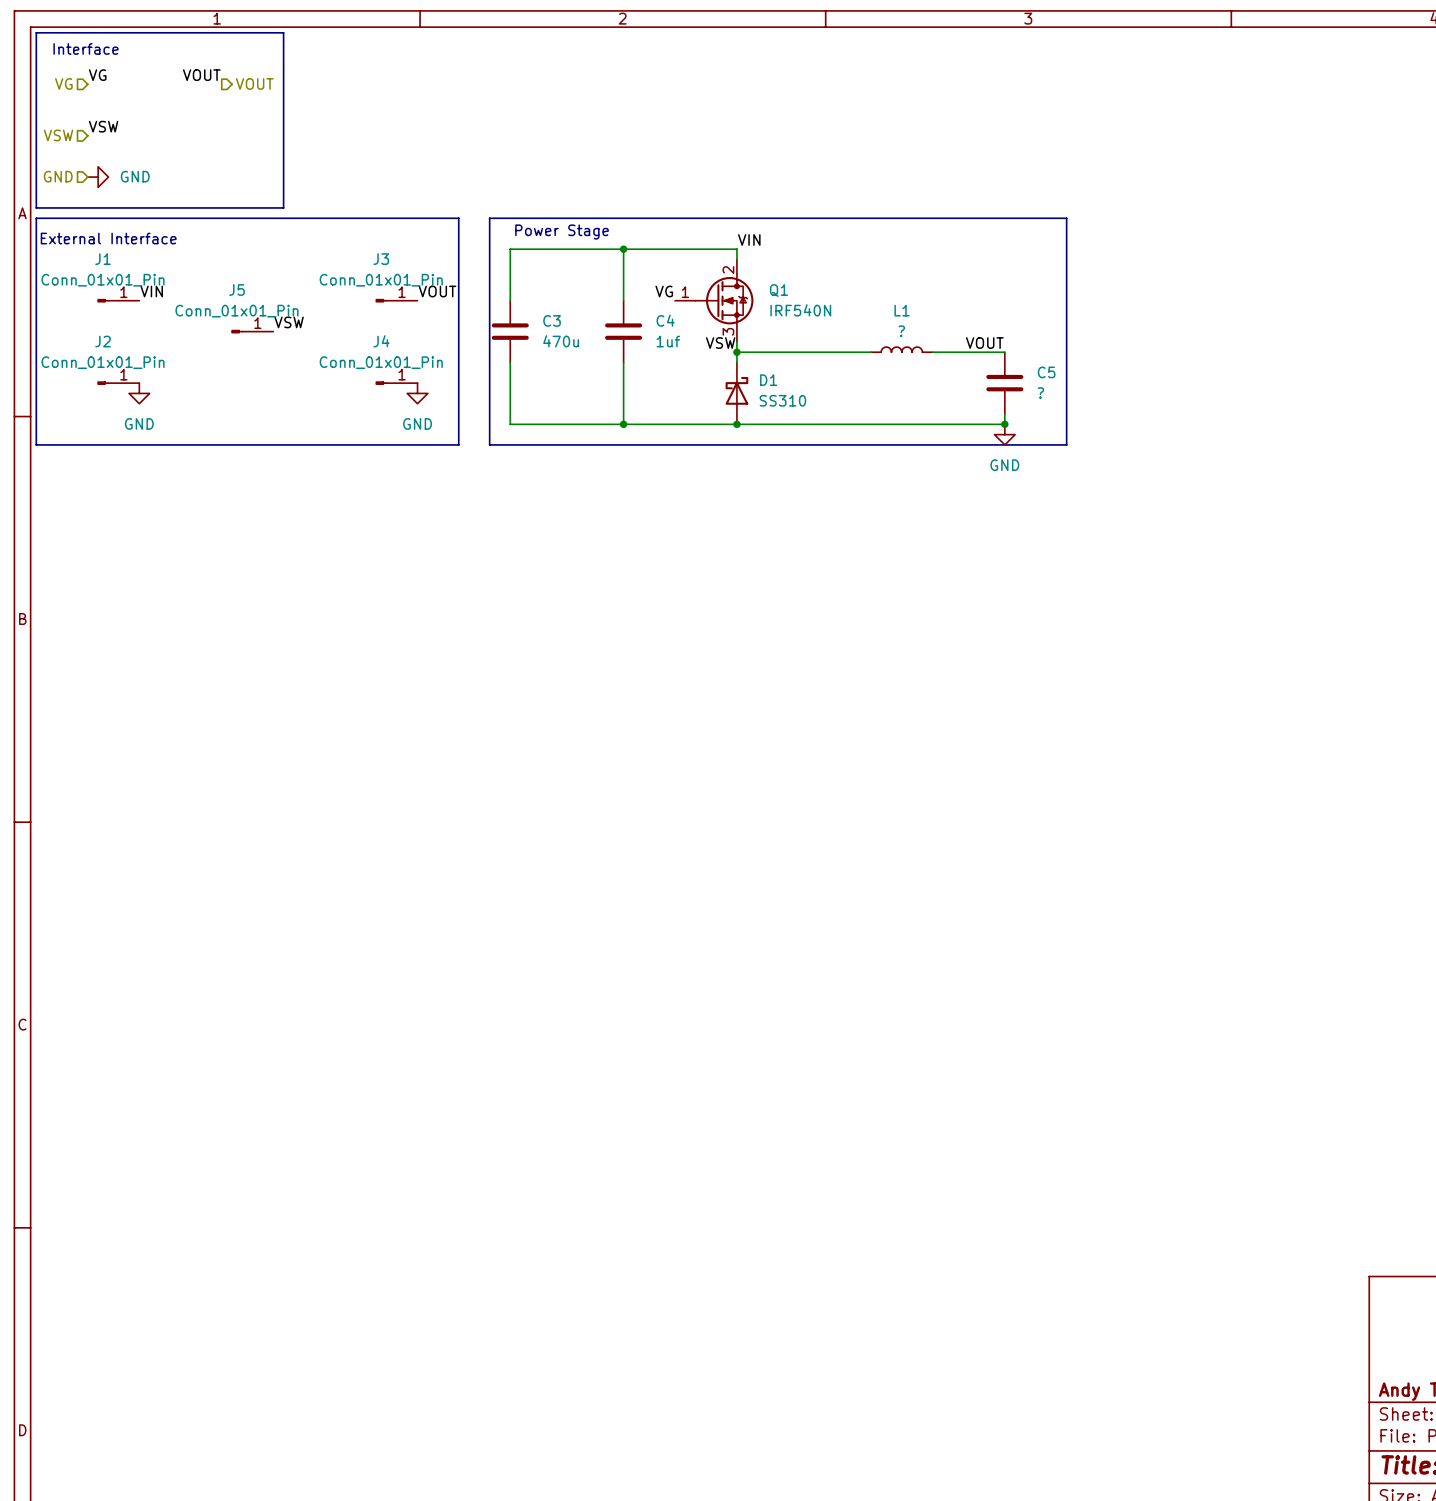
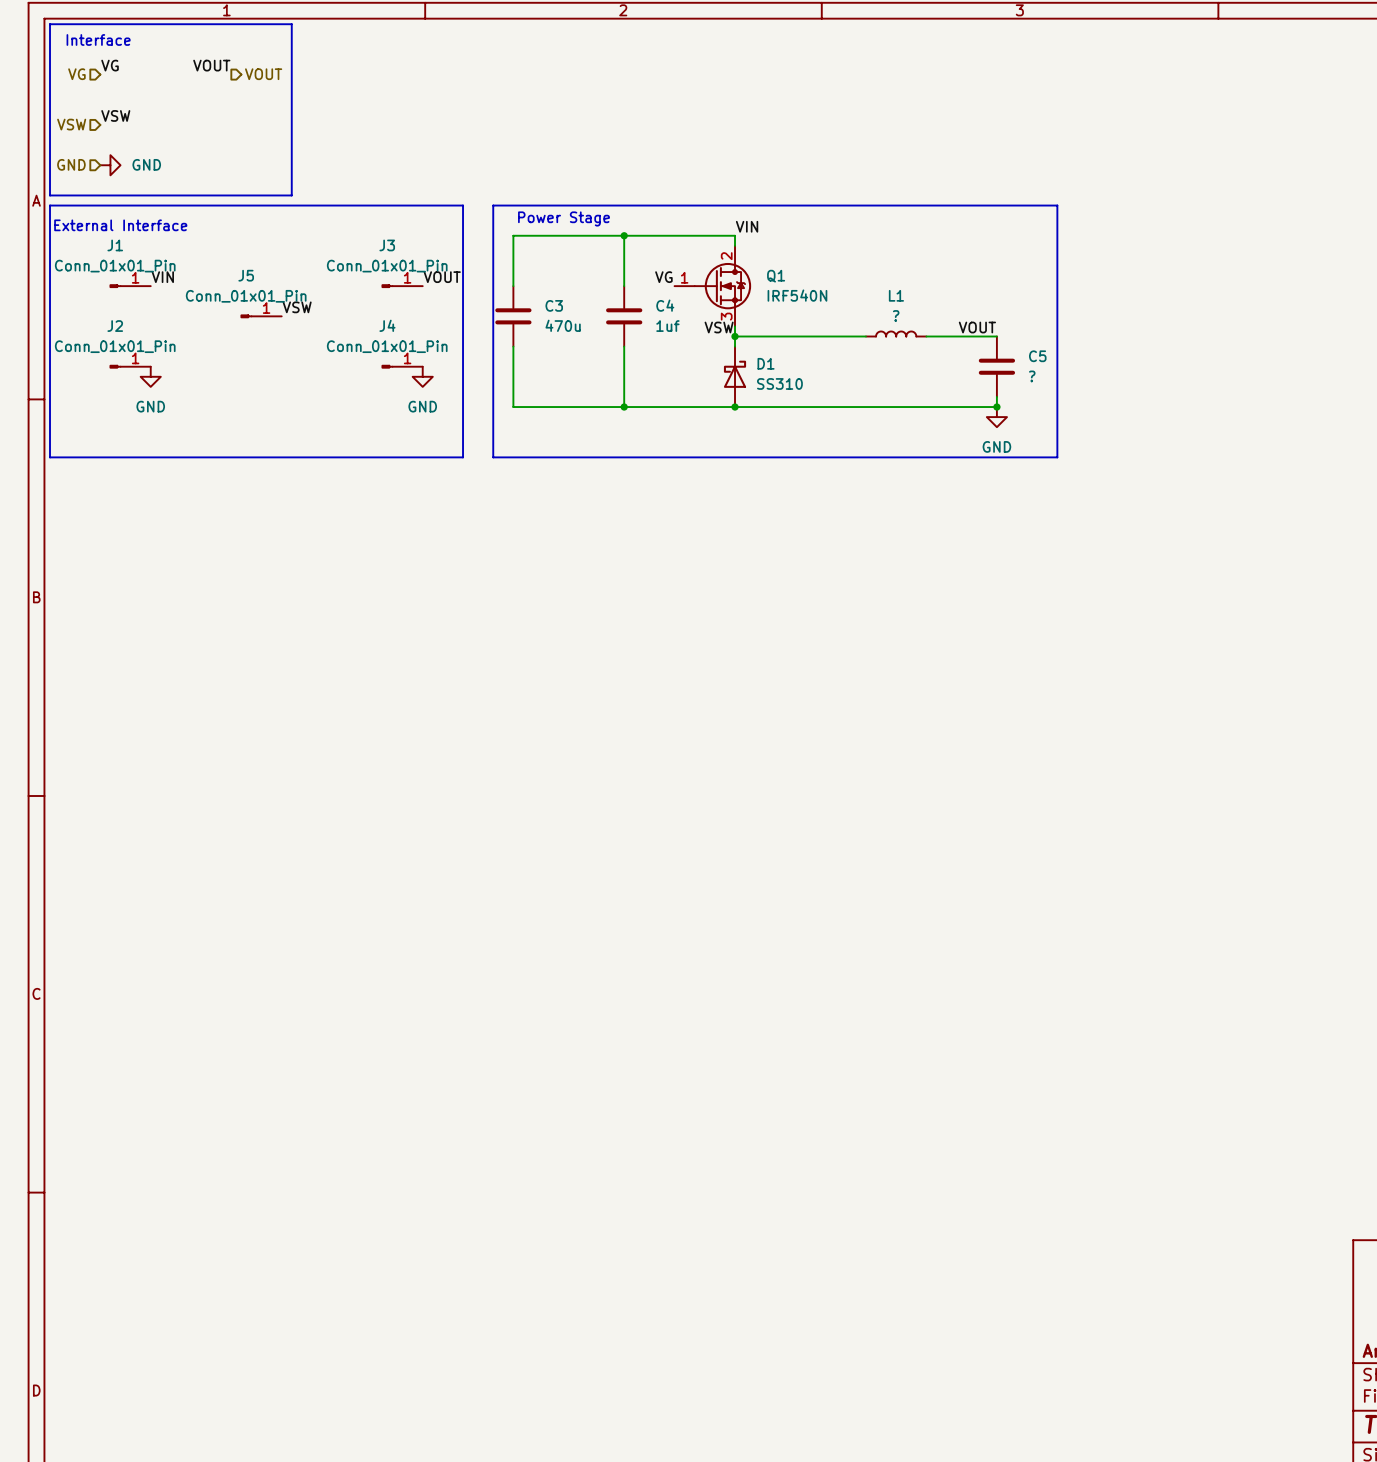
line: (36, 444) (458, 444) -> (50, 427) (50, 457) (463, 457) (463, 427)
line: (489, 444) (1066, 444) -> (493, 427) (493, 457) (1057, 457) (1057, 427)

